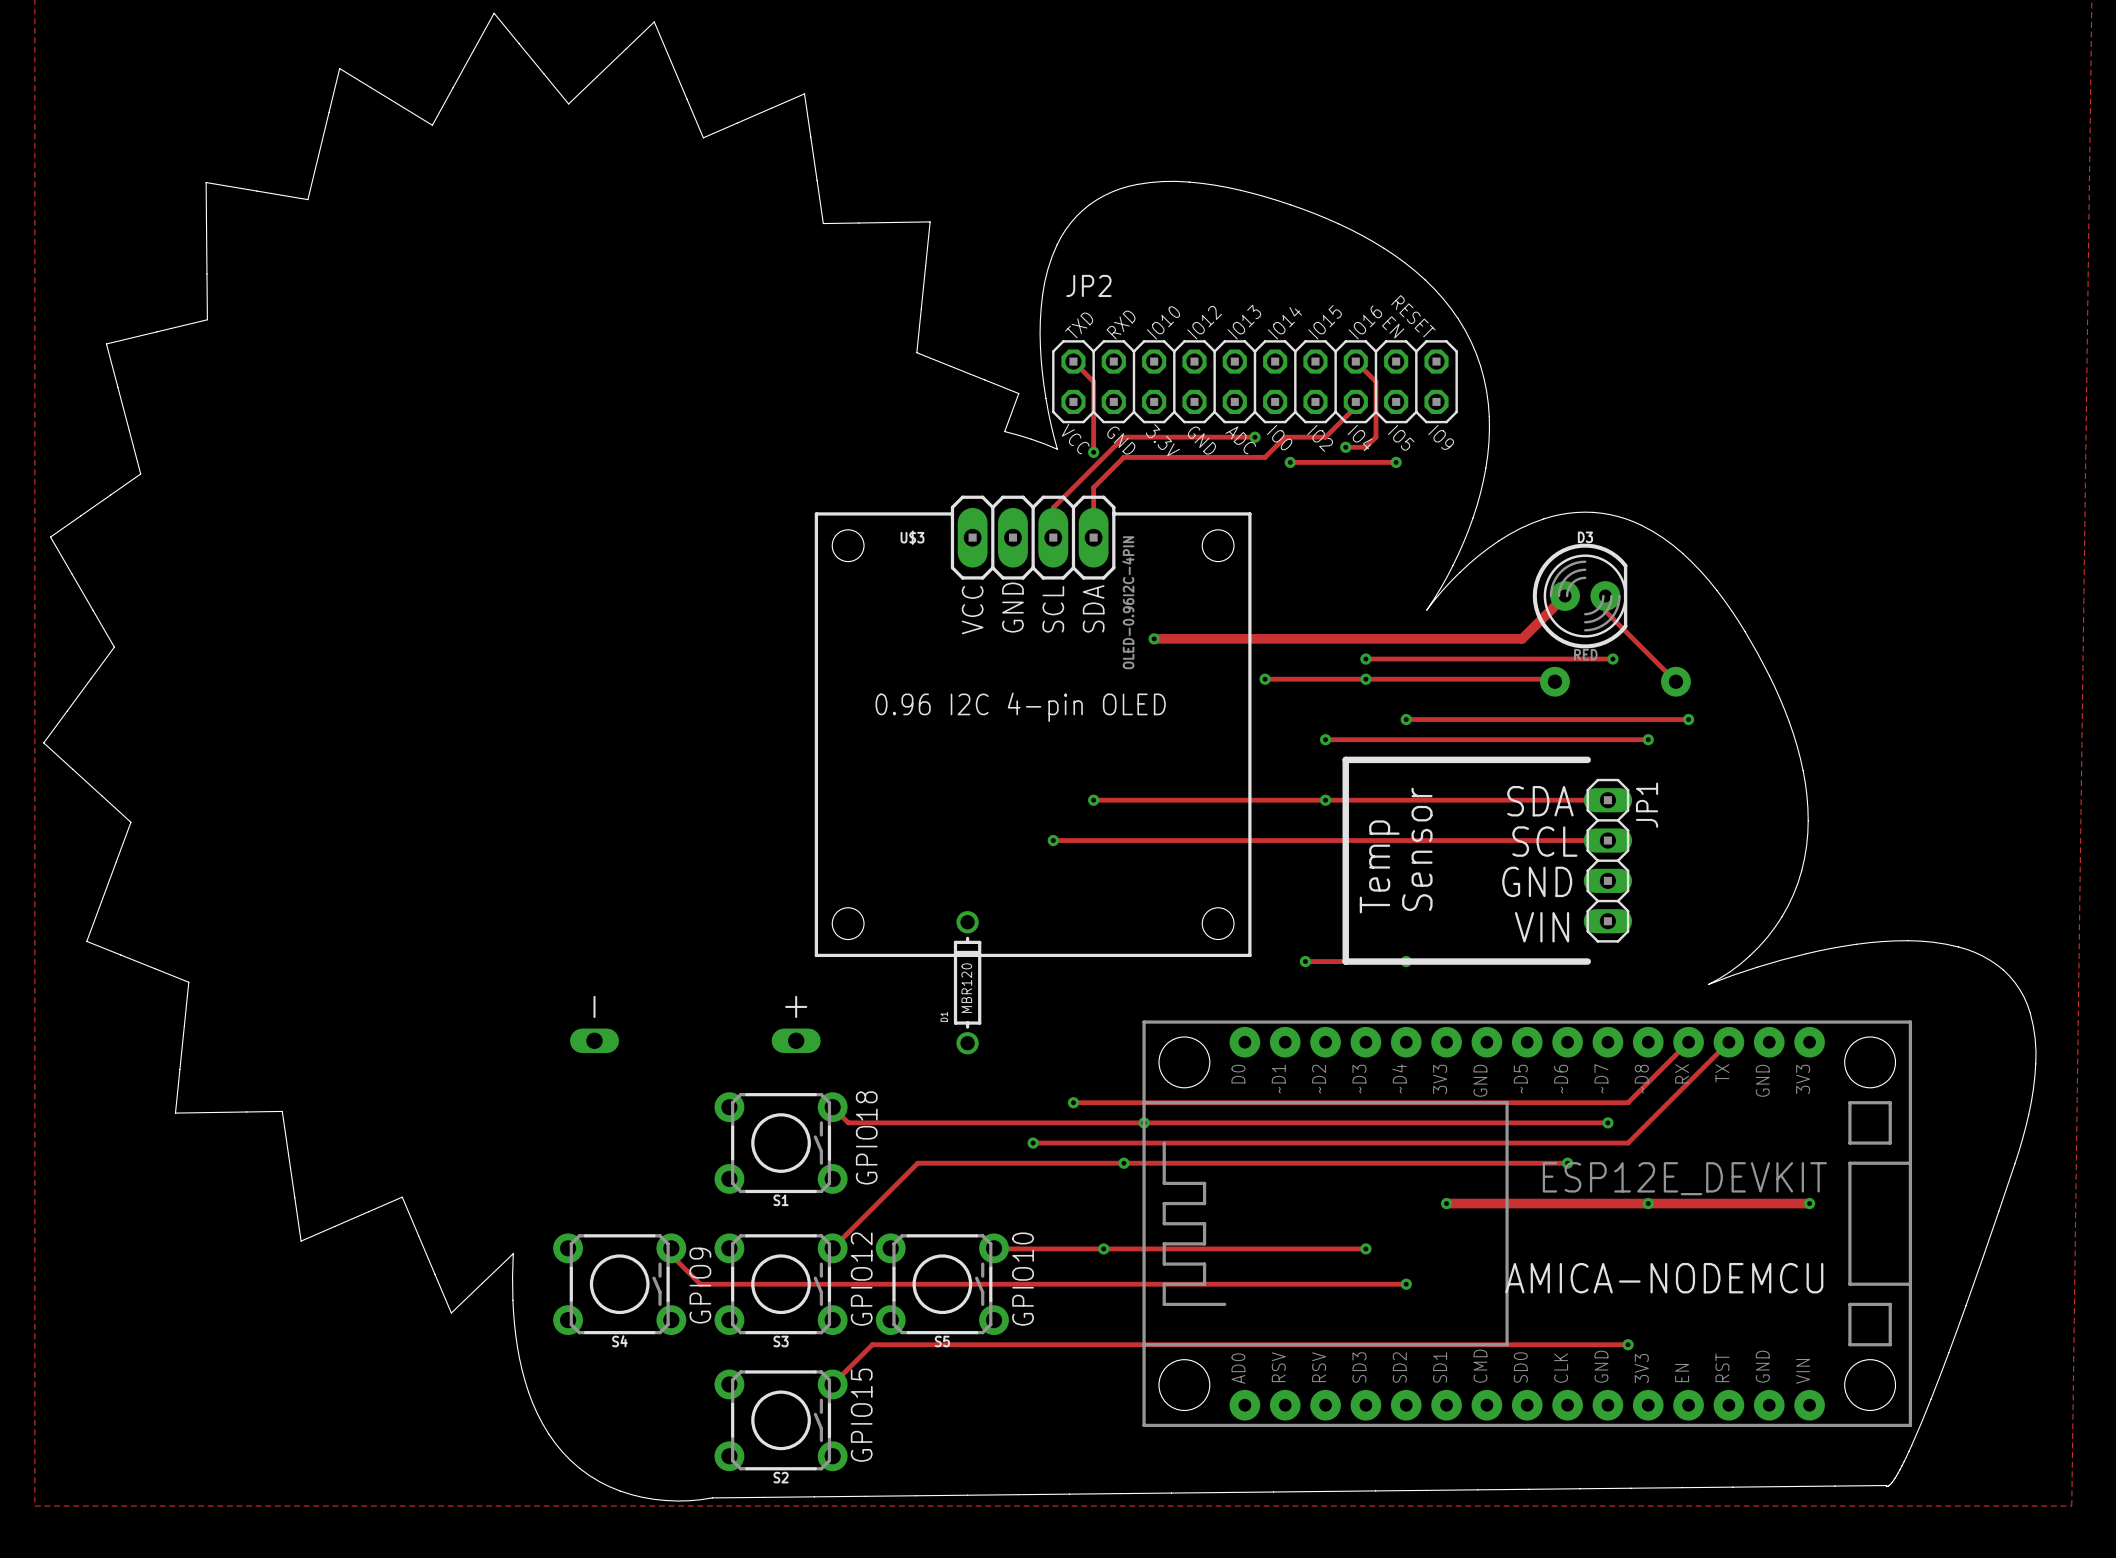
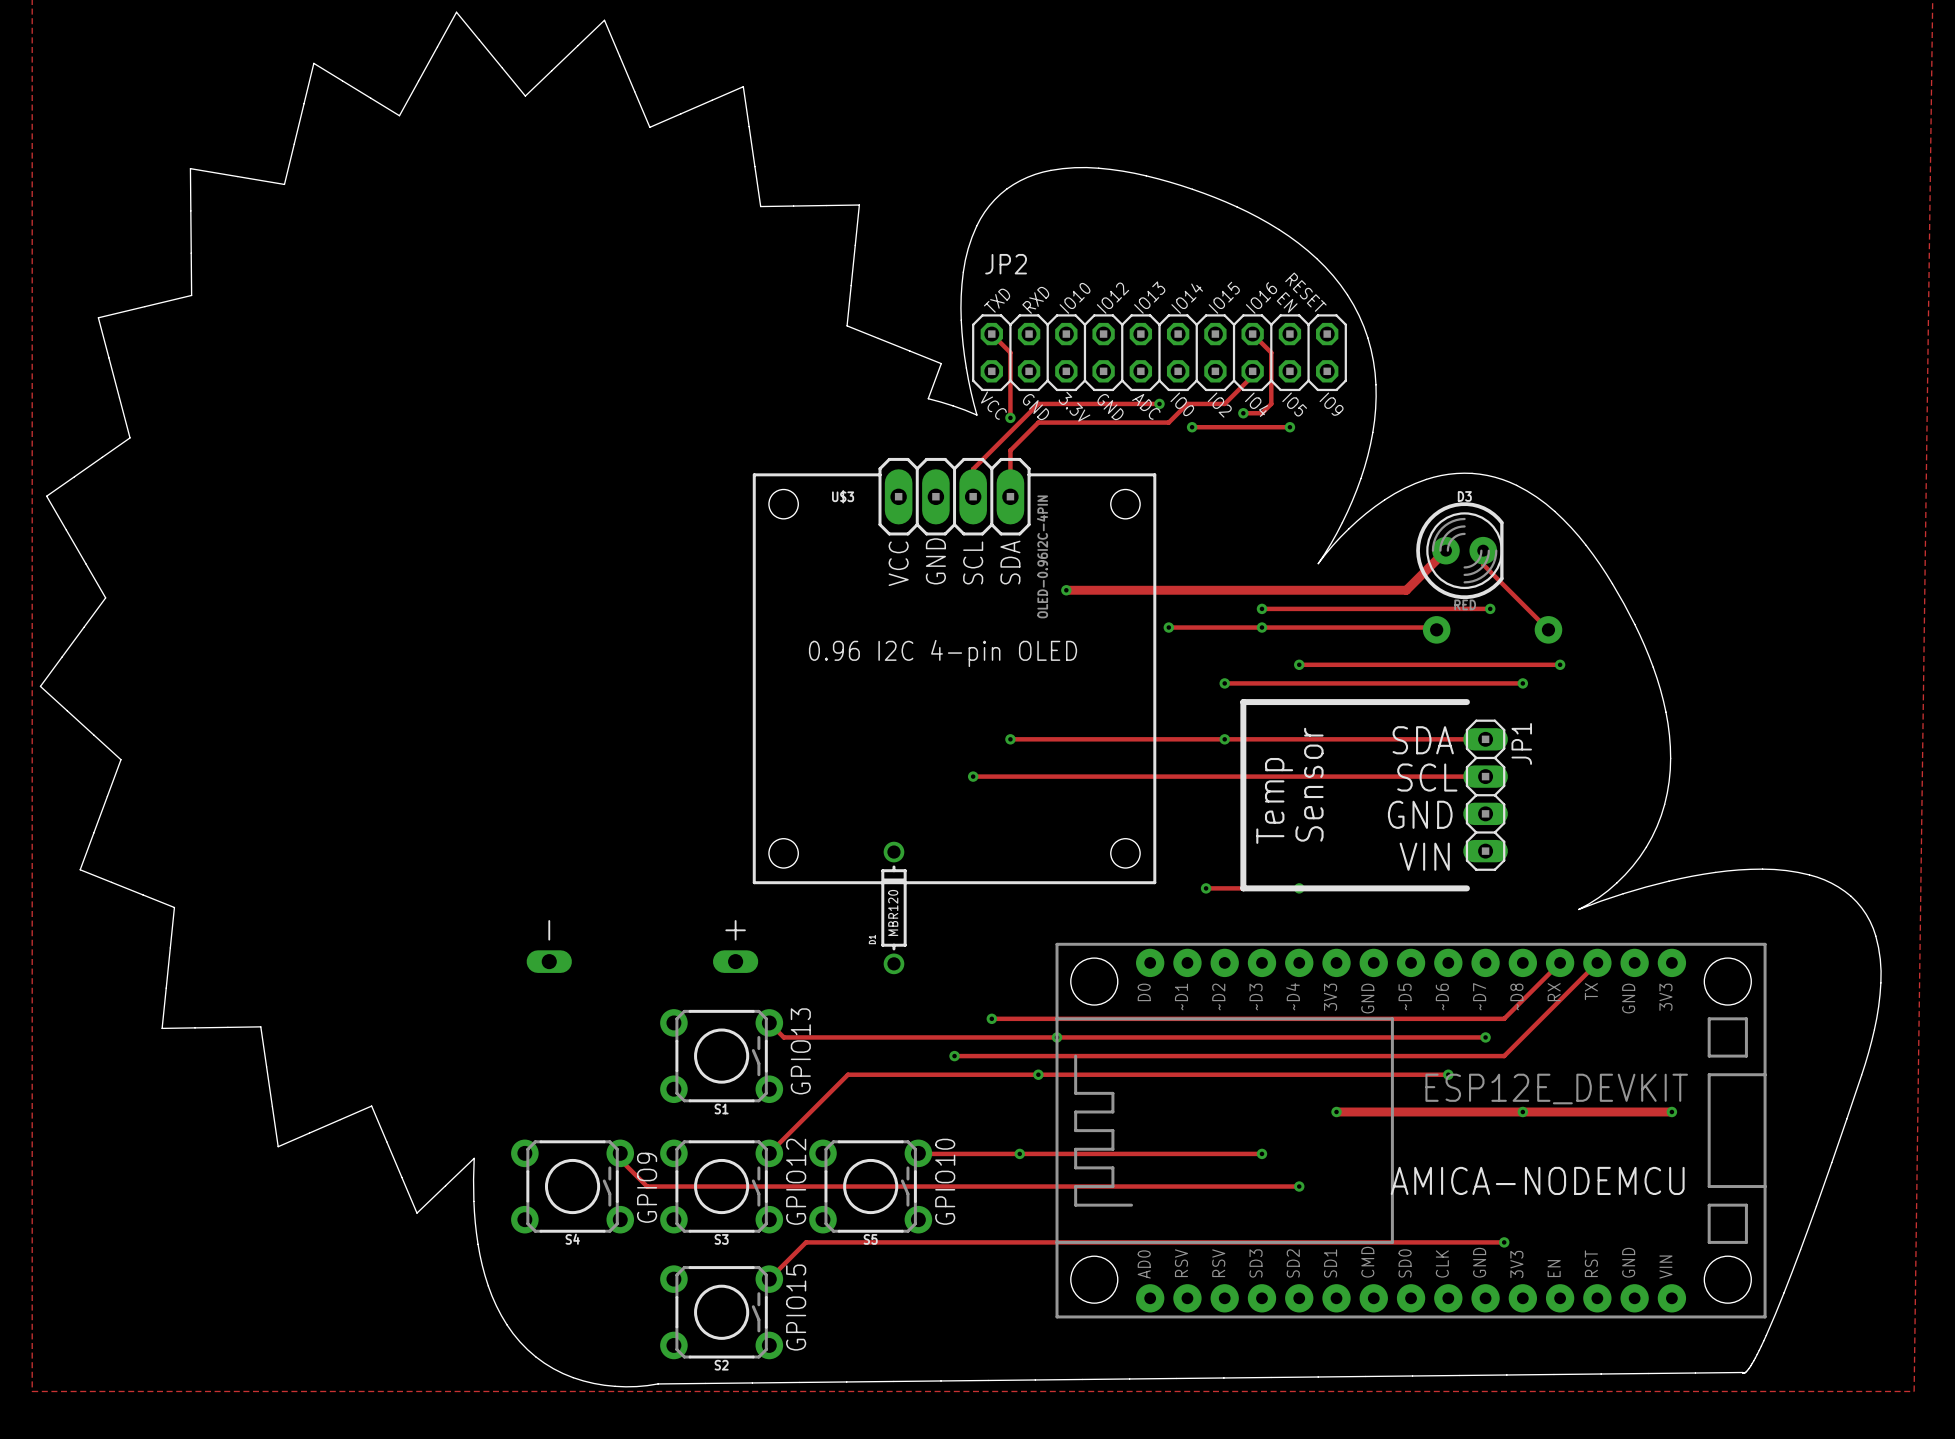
text: GPIO18 (866, 1137) -> GPIO13 (800, 1051)

